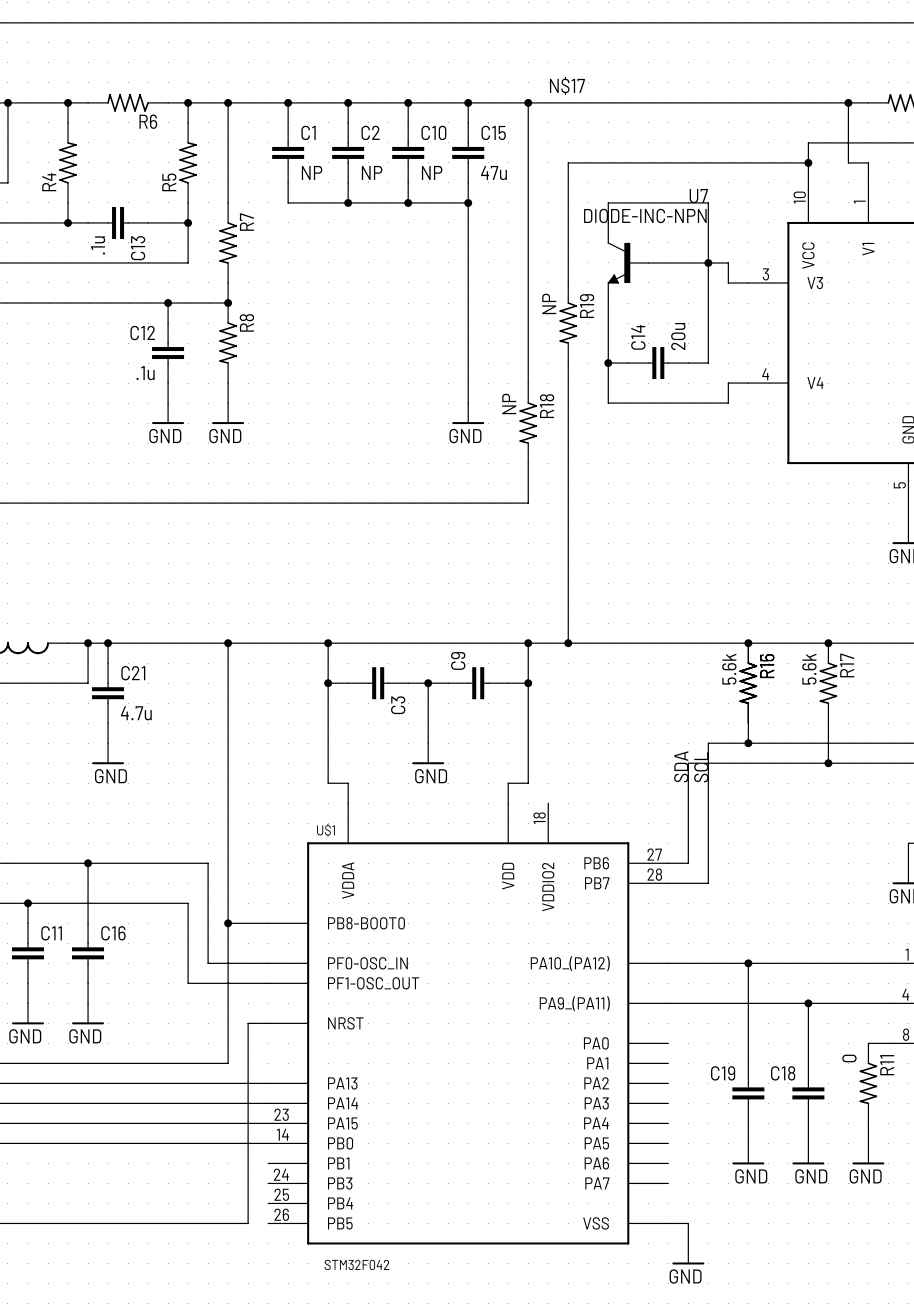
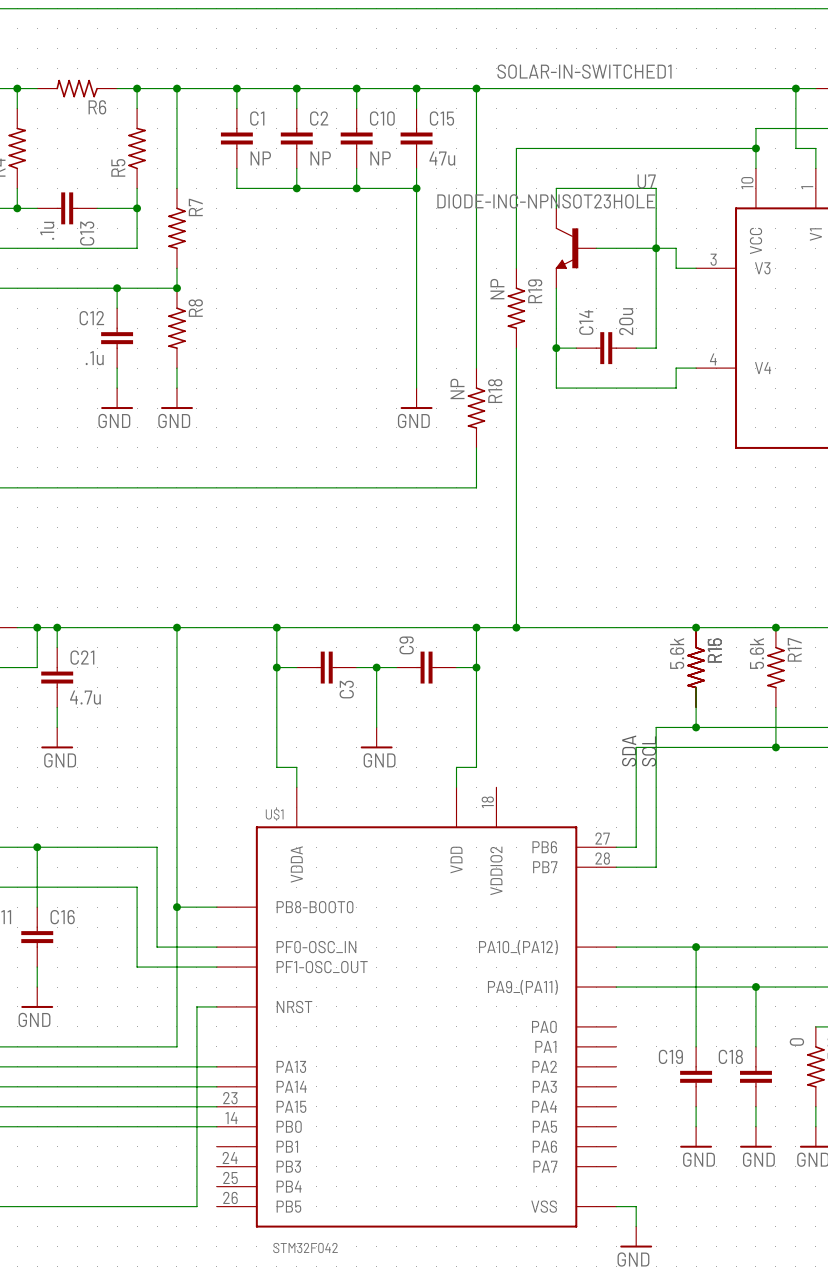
label: N$17 (567, 85) -> SOLAR-IN-SWITCHED1 (584, 71)
U7 value: DIODE-INC-NPN (645, 215) -> DIODE-INC-NPNSOT23HOLE (546, 201)

